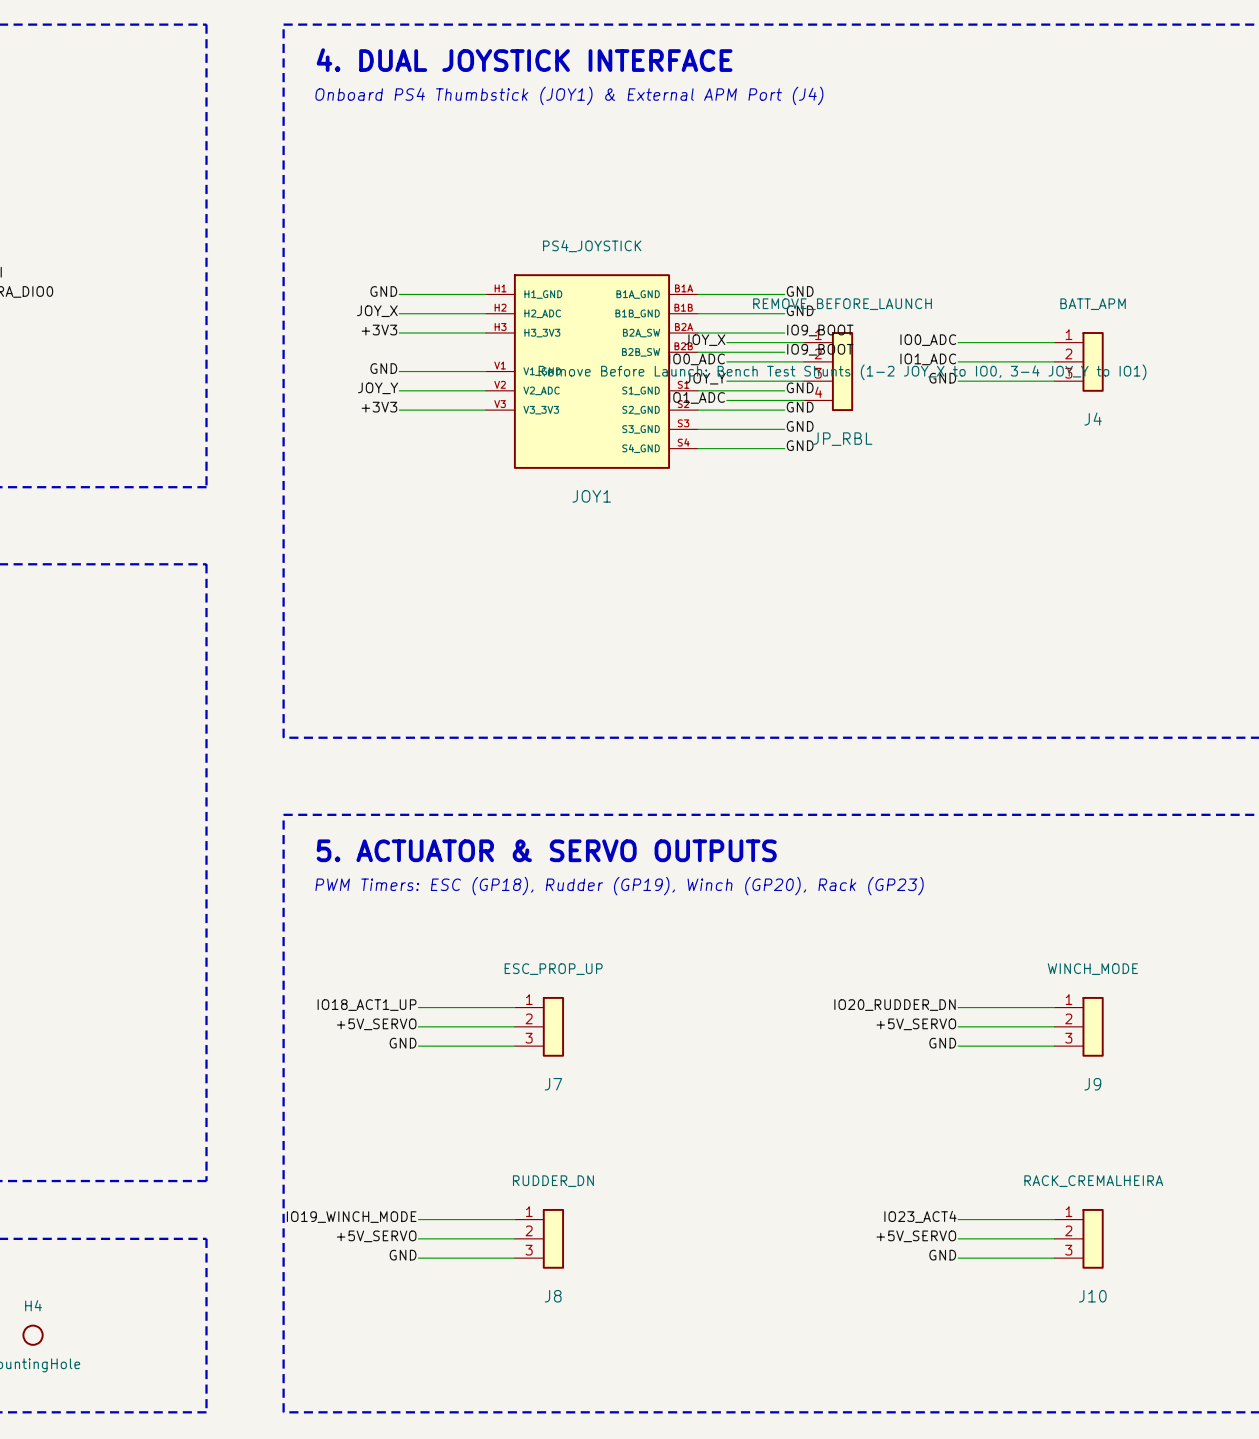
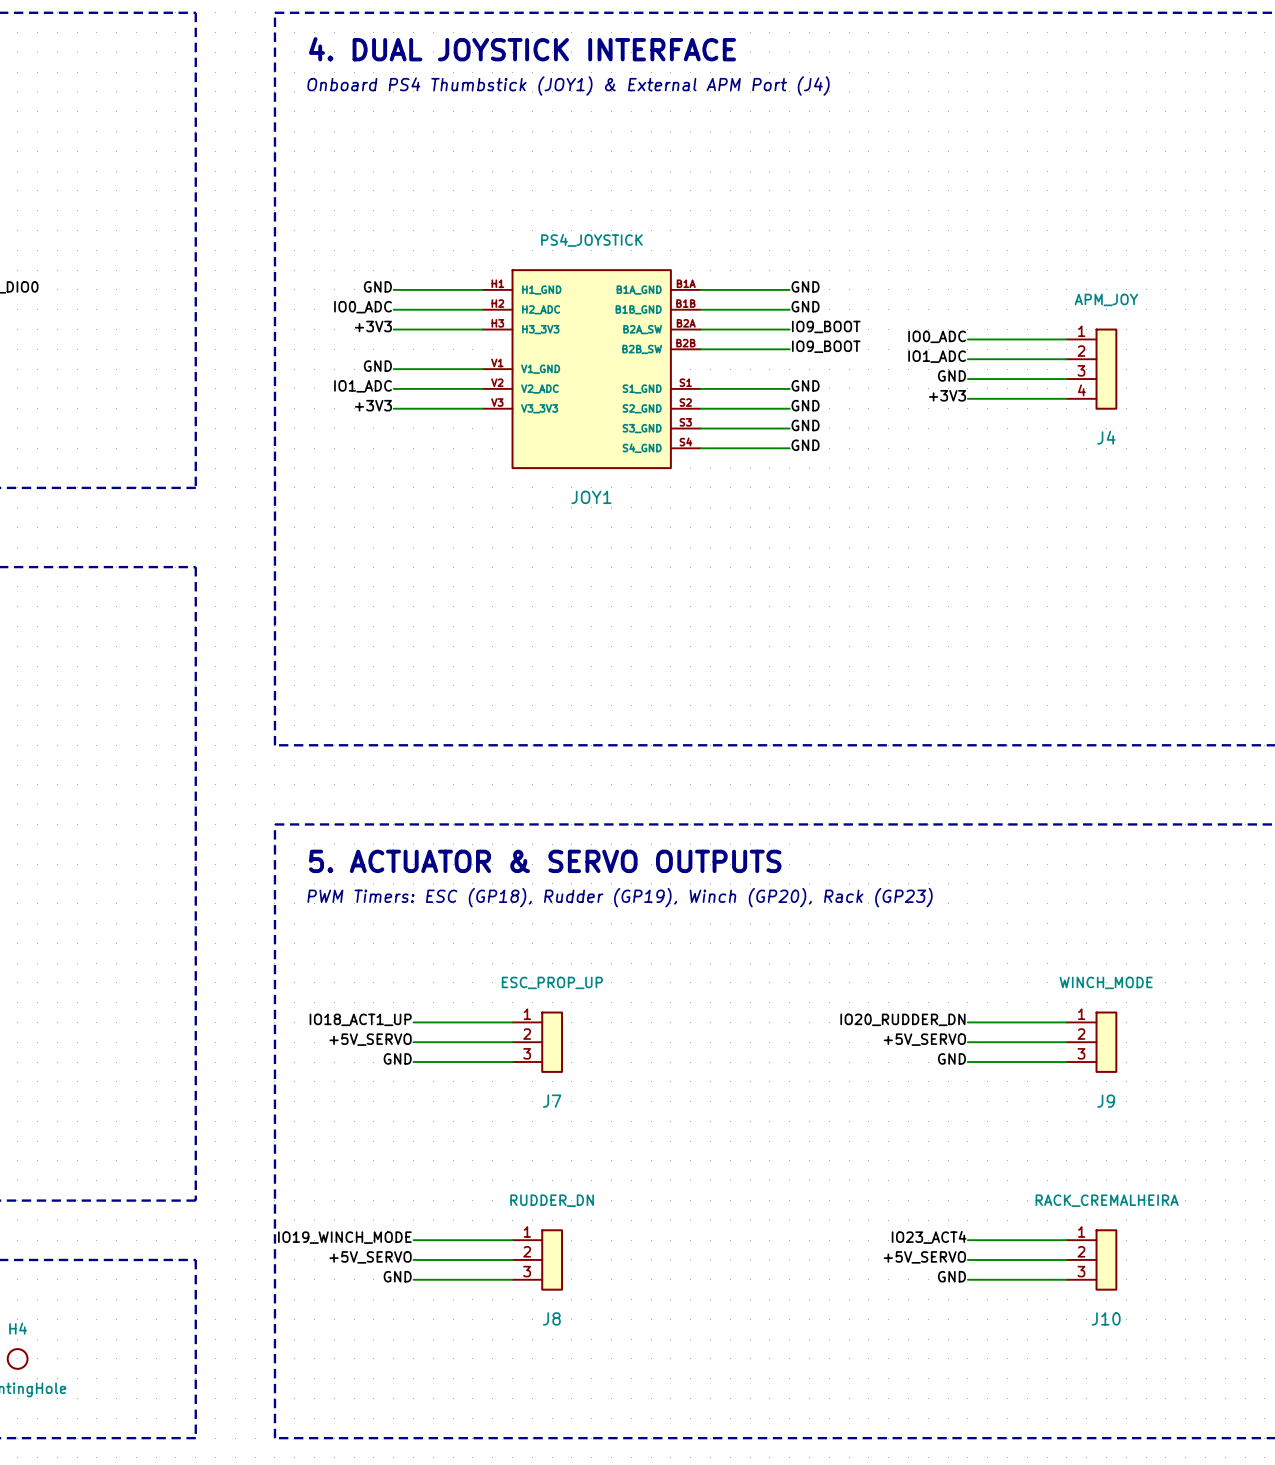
J4 value: BATT_APM (1093, 304) -> APM_JOY (1106, 299)
label: JOY_X (377, 311) -> IO0_ADC (363, 307)
J4 symbol: [1054, 332, 1104, 392] -> [1066, 328, 1118, 410]
label: JOY_X (705, 340) -> none
wire: (726, 342) (803, 342) -> none
label: IO0_ADC (696, 359) -> none
wire: (726, 361) (803, 361) -> none
JP_RBL: REMOVE_BEFORE_LAUNCH (828, 371) -> none
label: JOY_Y (705, 378) -> none
wire: (726, 381) (803, 381) -> none
label: JOY_Y (378, 388) -> IO1_ADC (363, 386)
label: IO1_ADC (696, 397) -> none
label: none -> +3V3 (947, 395)
wire: (726, 400) (803, 400) -> none
wire: none -> (967, 398) (1066, 398)

